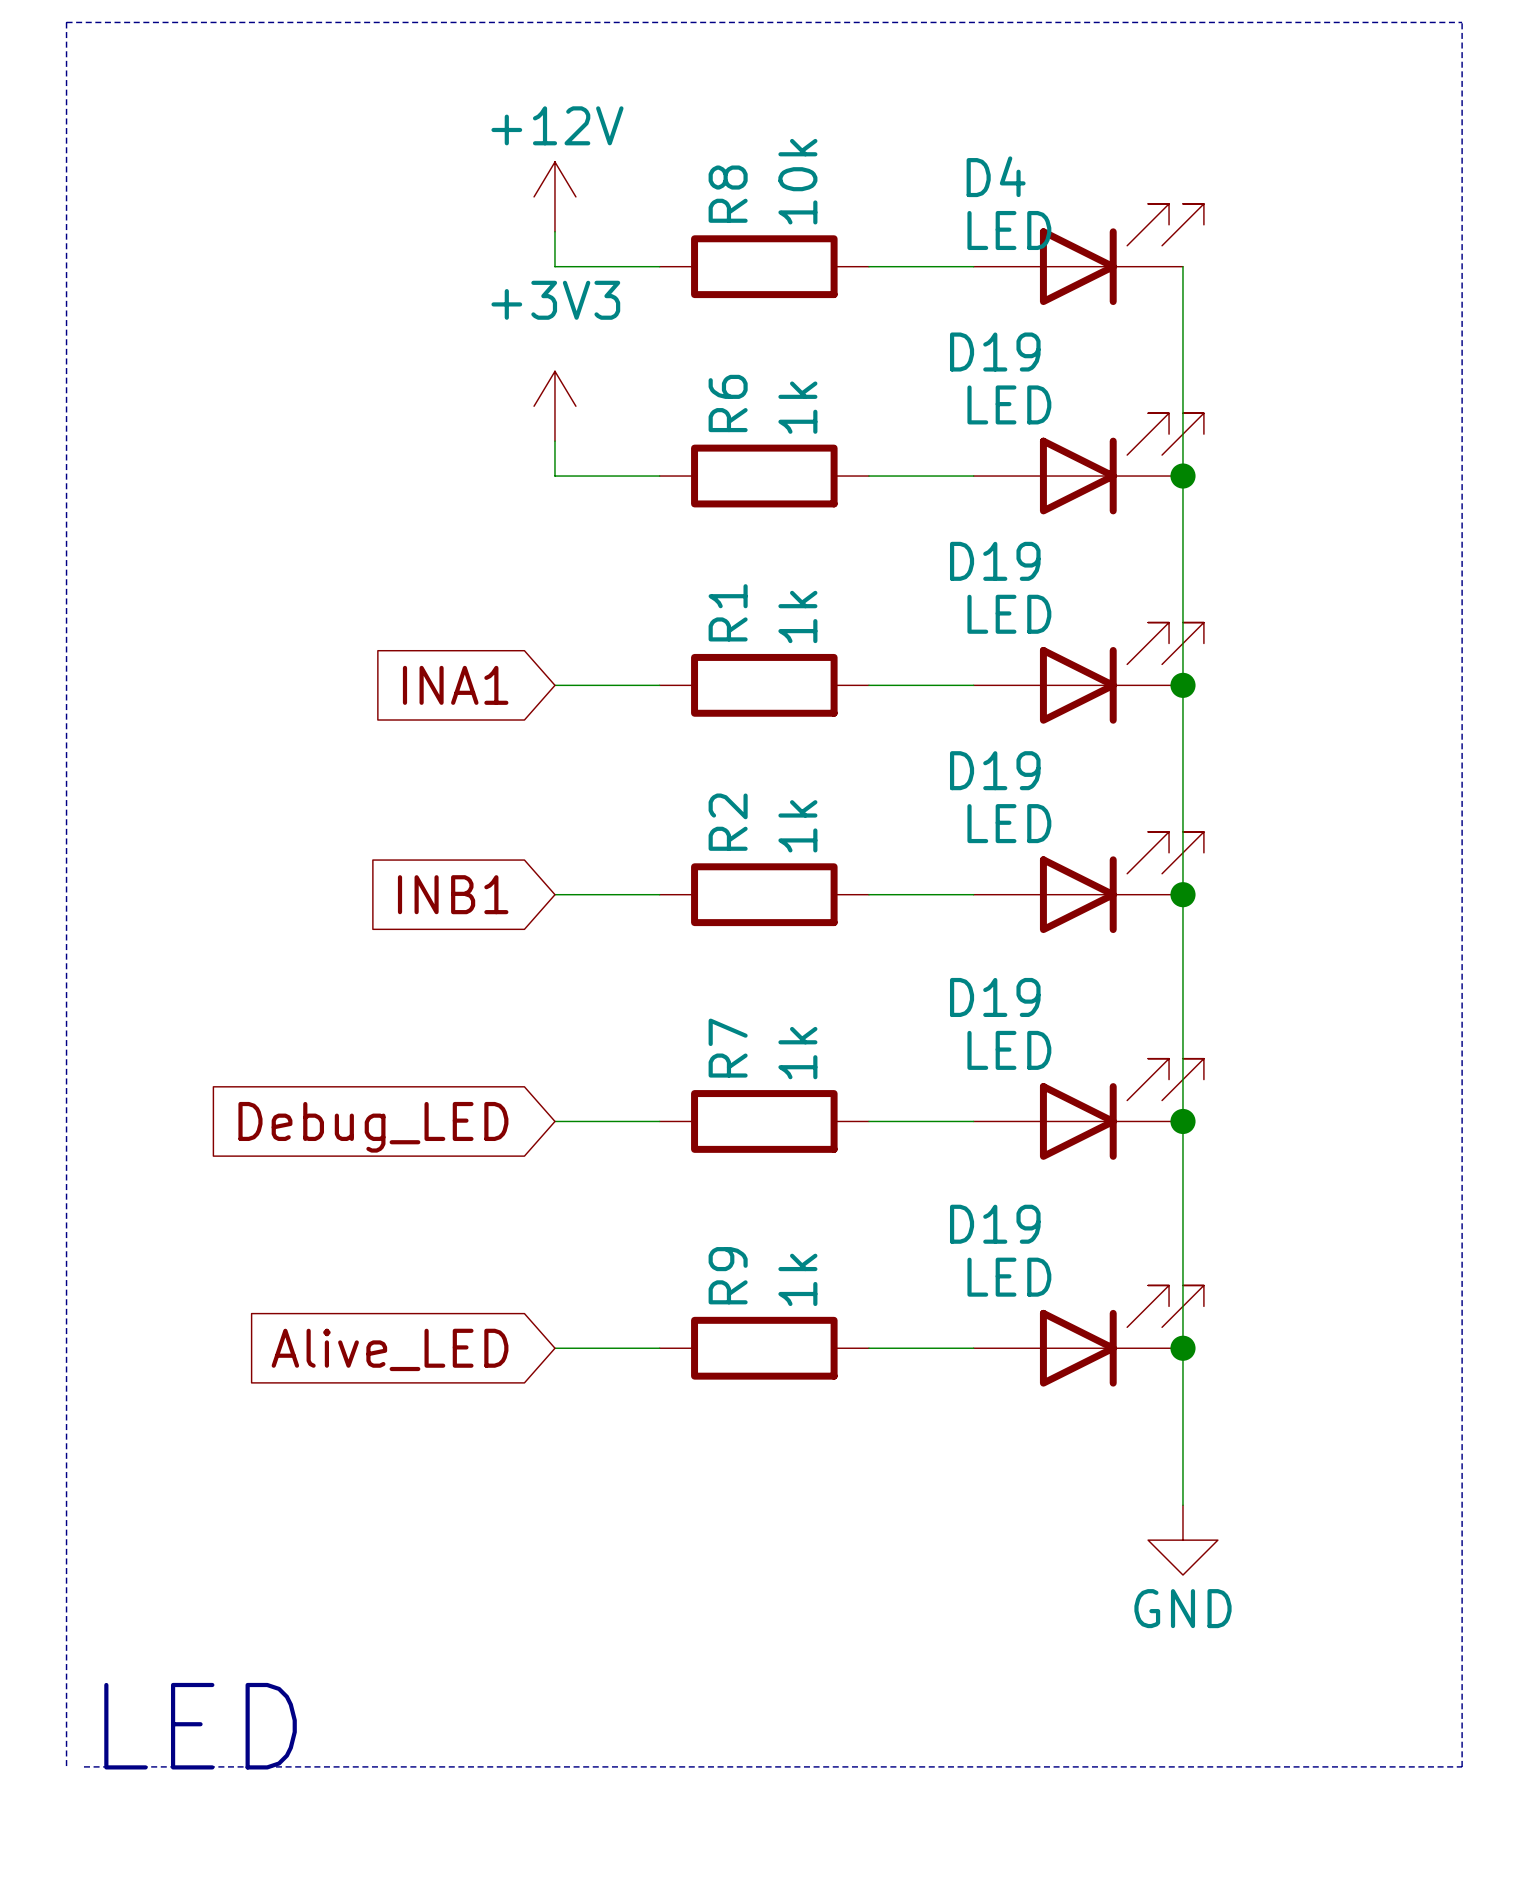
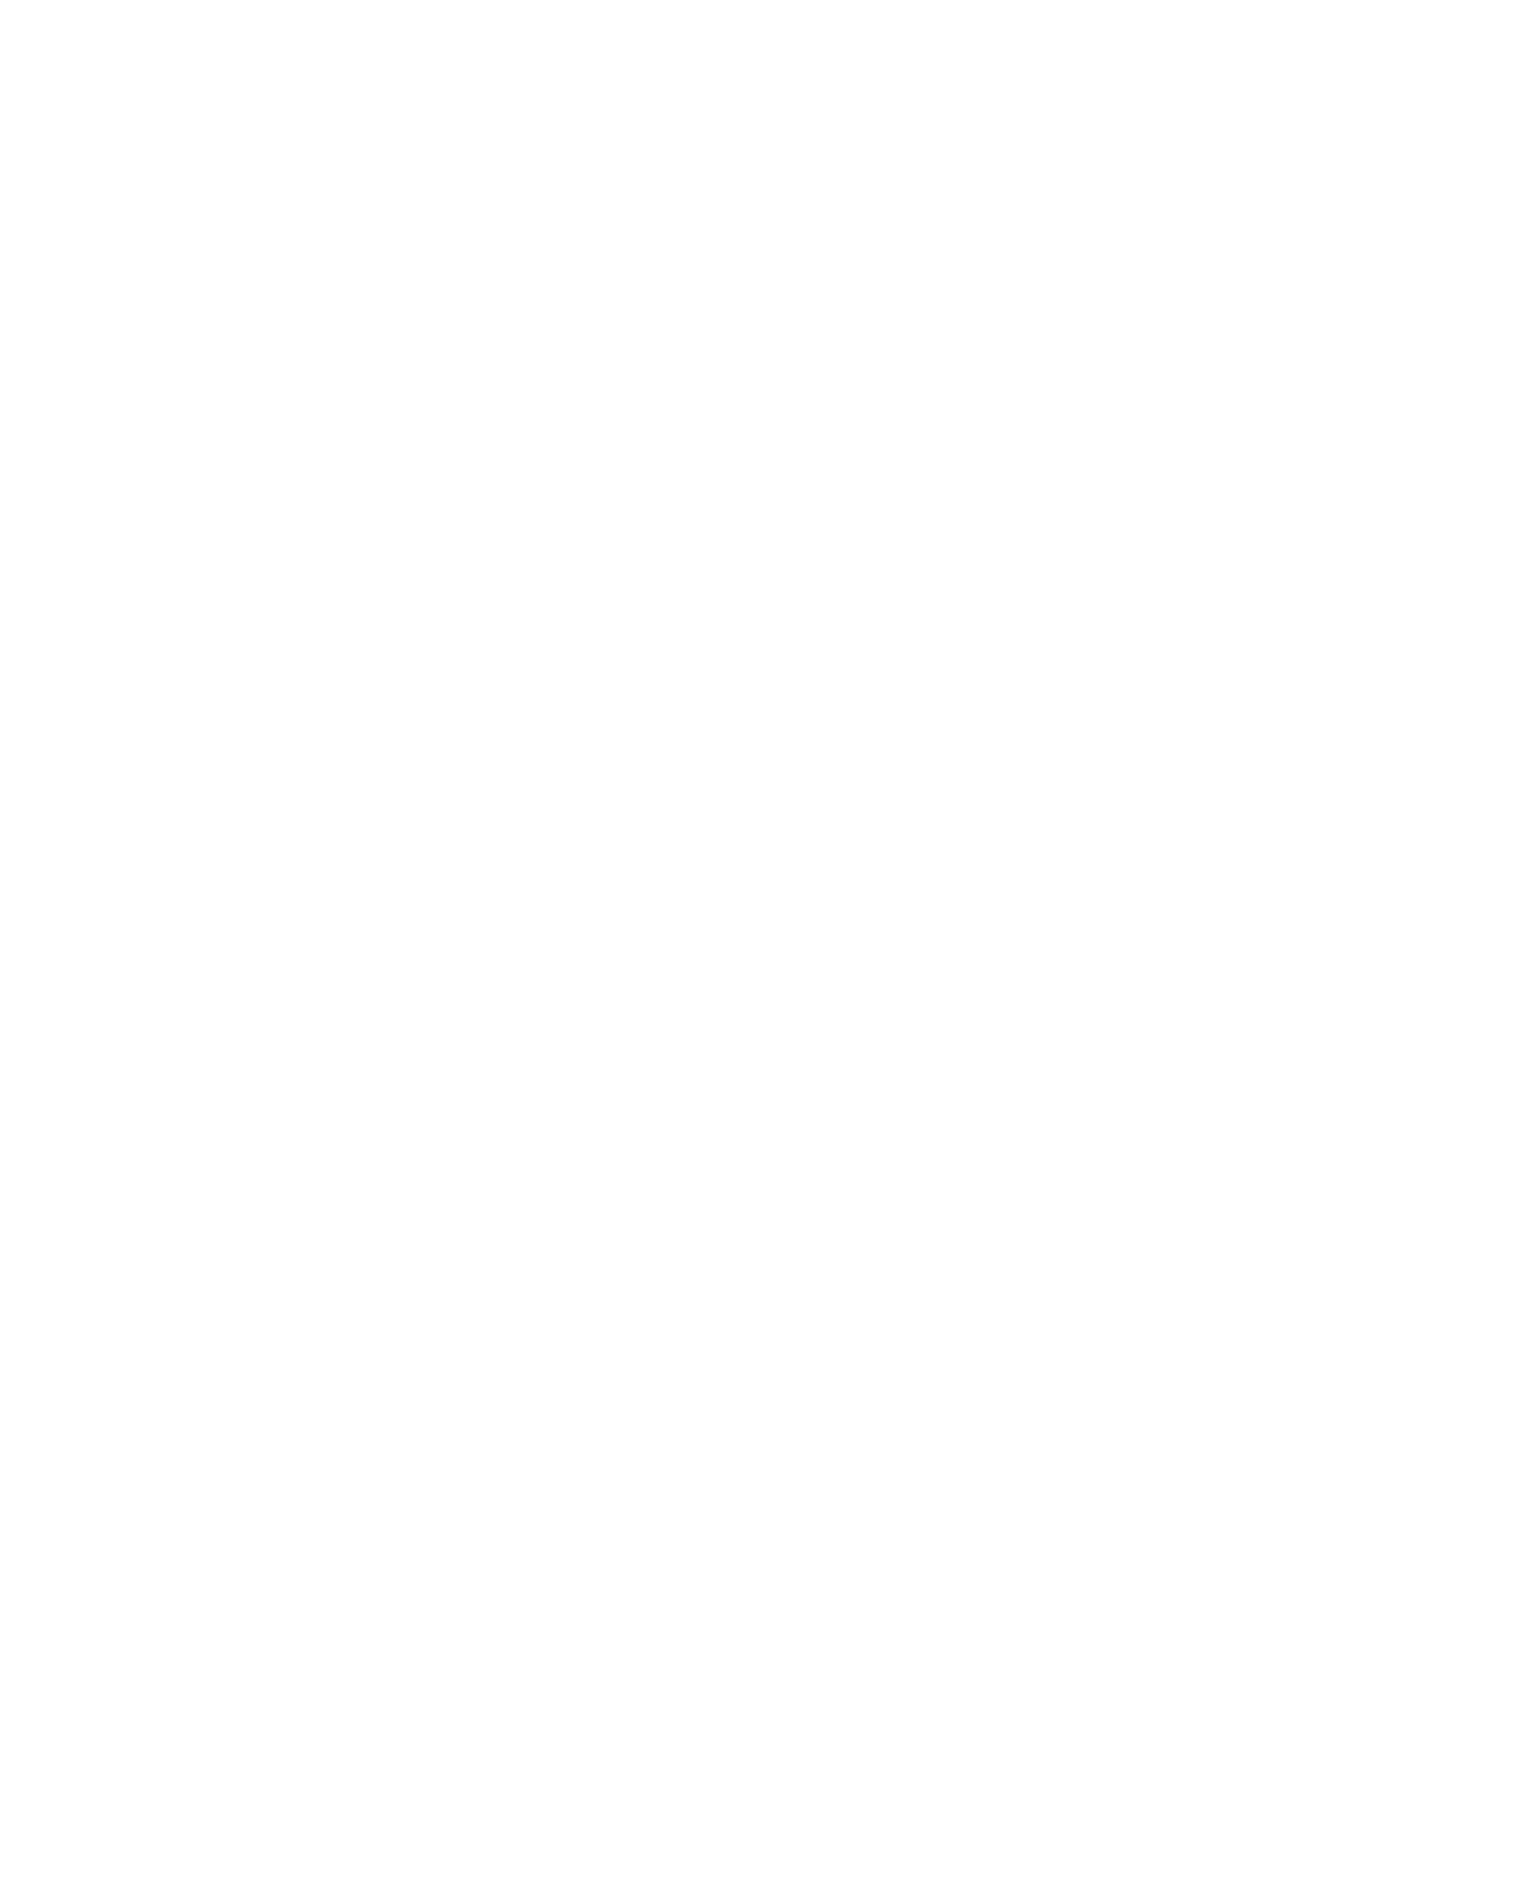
power symbol: +12V (554, 196) -> none
wire: (554, 231) (554, 266) (659, 266) -> none
D4: LED (1088, 254) -> none
R8: 10k (764, 266) -> none
wire: (868, 266) (973, 266) -> none
wire: (1182, 266) (1182, 1505) -> none
power symbol: +3V3 (554, 406) -> none
wire: (554, 441) (554, 476) (659, 476) -> none
D19: LED (1088, 463) -> none
R6: 1k (764, 476) -> none
wire: (868, 476) (973, 476) -> none
junction: (1182, 476) -> none
D19: LED (1088, 673) -> none
global label: INA1 (455, 685) -> none
wire: (554, 685) (659, 685) -> none
R1: 1k (764, 685) -> none
wire: (868, 685) (973, 685) -> none
junction: (1182, 685) -> none
D19: LED (1088, 882) -> none
global label: INB1 (453, 894) -> none
wire: (554, 894) (659, 894) -> none
R2: 1k (764, 894) -> none
wire: (868, 894) (973, 894) -> none
junction: (1182, 894) -> none
D19: LED (1088, 1109) -> none
wire: (554, 1121) (659, 1121) -> none
R7: 1k (764, 1121) -> none
wire: (868, 1121) (973, 1121) -> none
junction: (1182, 1121) -> none
global label: Debug_LED (373, 1127) -> none
D19: LED (1088, 1336) -> none
wire: (554, 1348) (659, 1348) -> none
R9: 1k (764, 1348) -> none
wire: (868, 1348) (973, 1348) -> none
junction: (1182, 1348) -> none
global label: Alive_LED (390, 1349) -> none
power symbol: GND (1182, 1540) -> none
text: LED (200, 1726) -> none
line: (66, 1766) (66, 22) (1462, 22) (1462, 1766) (83, 1766) -> none

